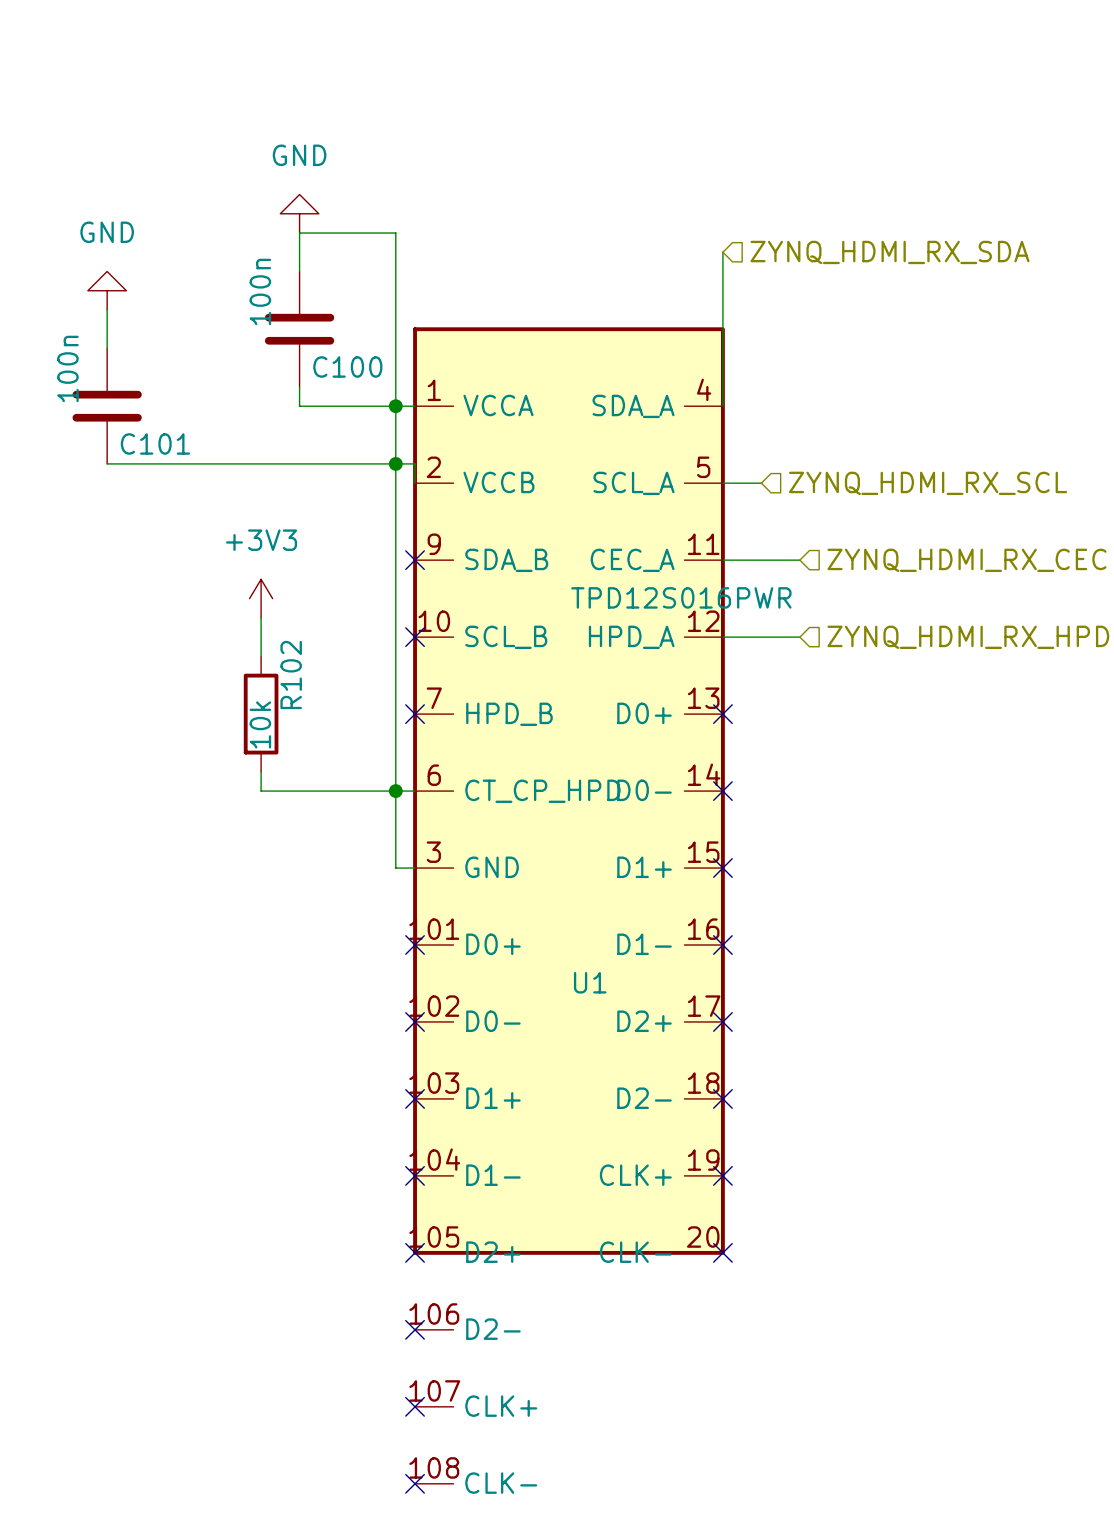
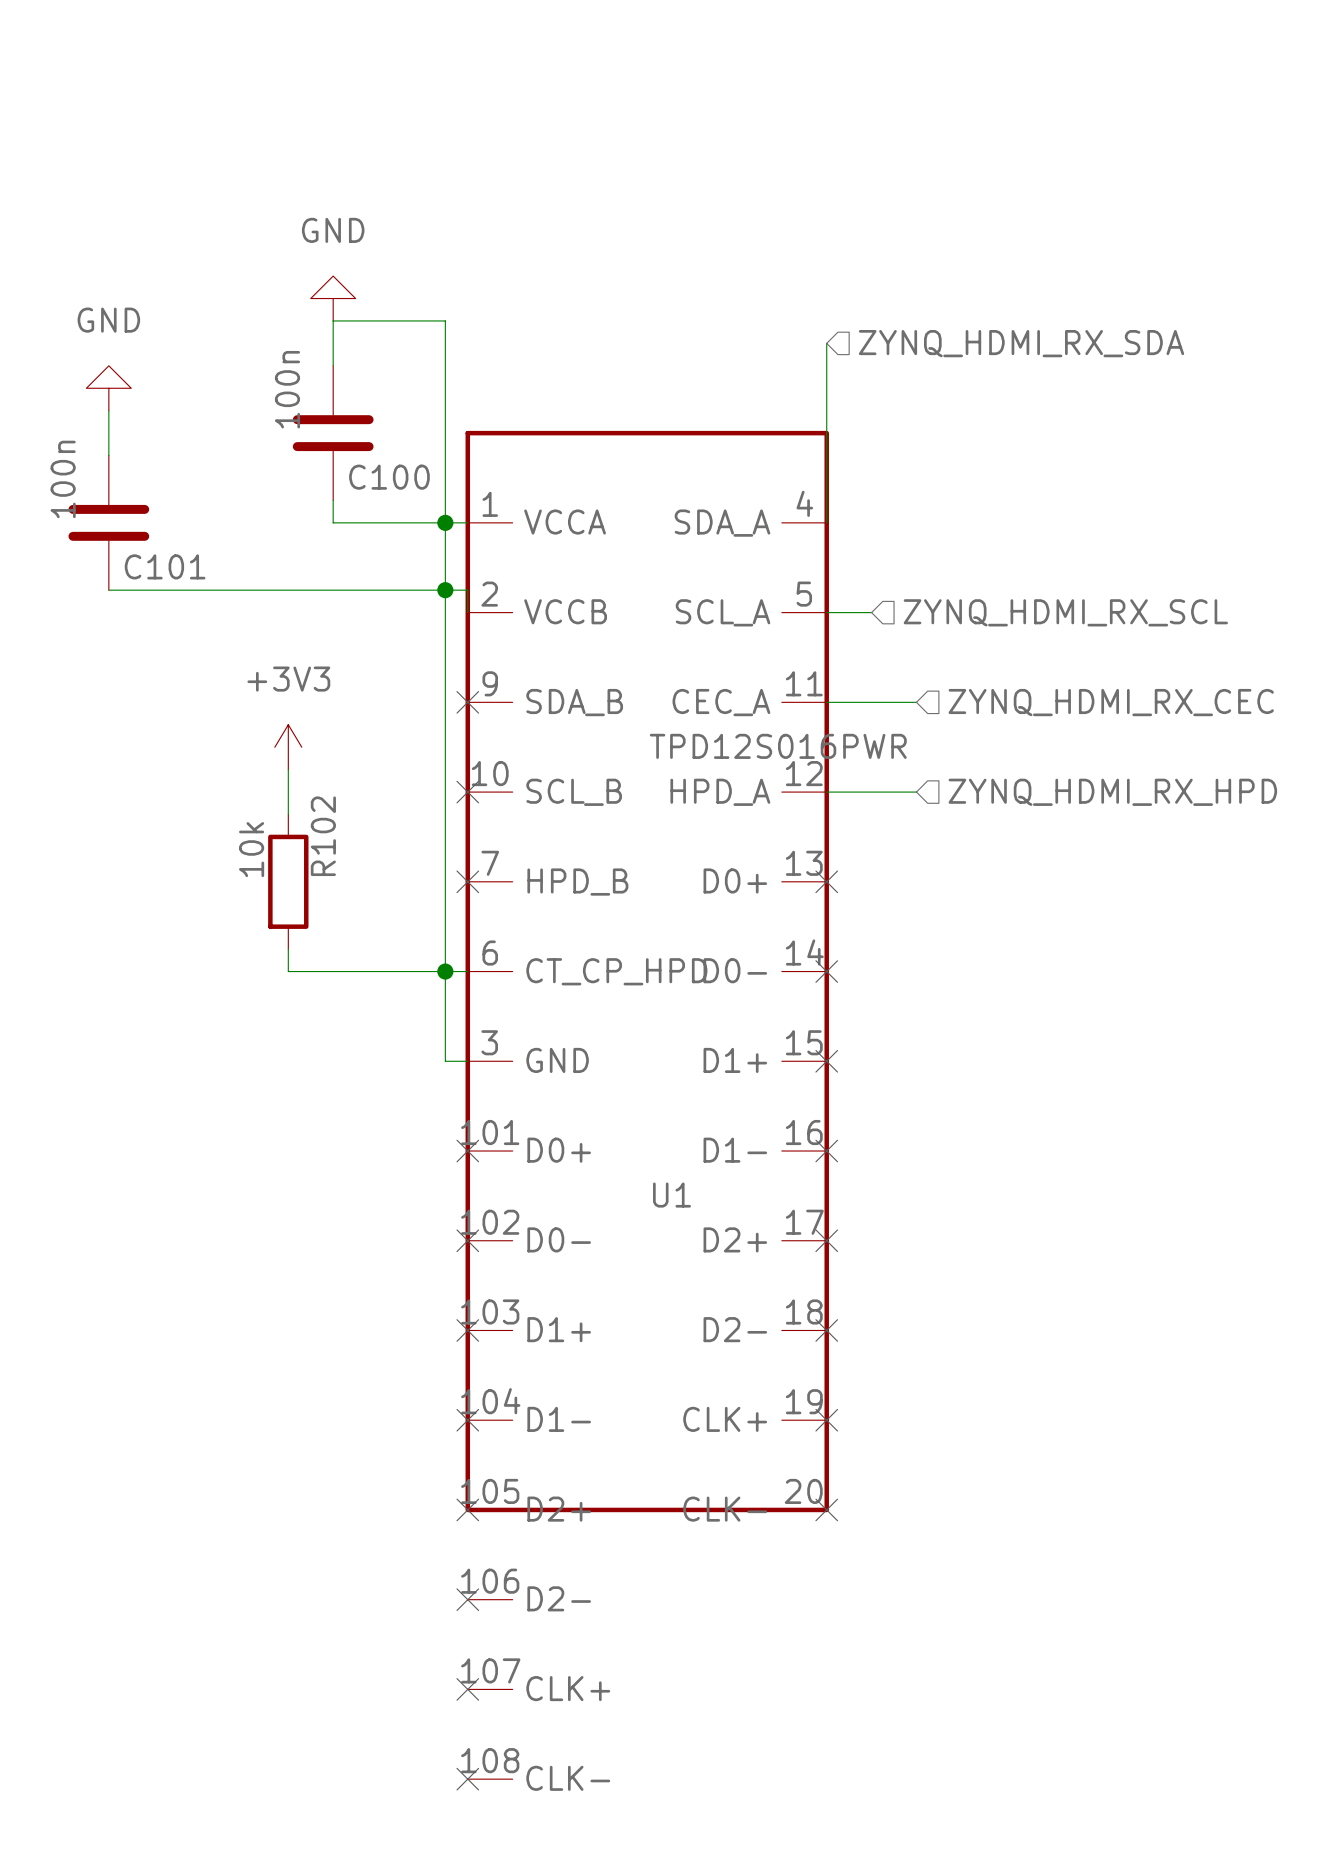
R102 value position: 10k (260, 724) -> 10k (251, 849)

